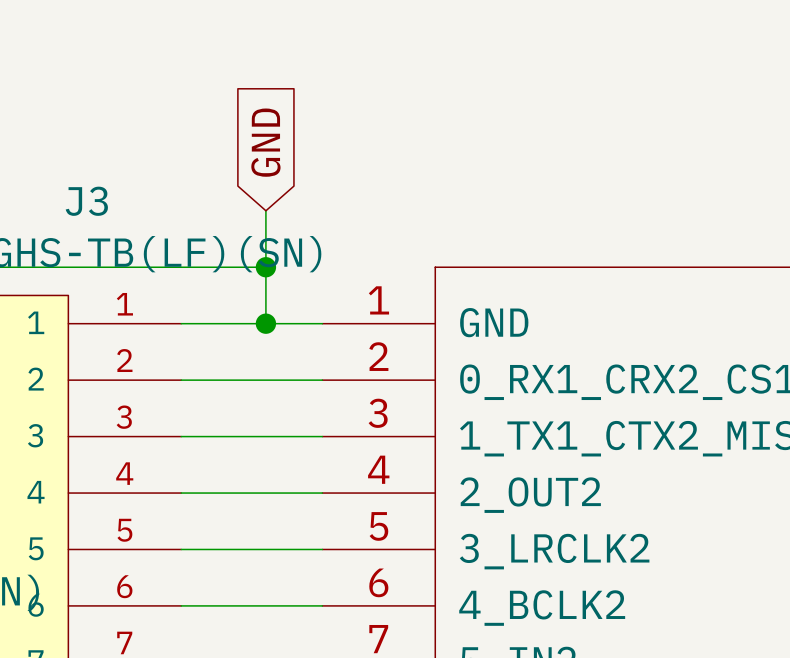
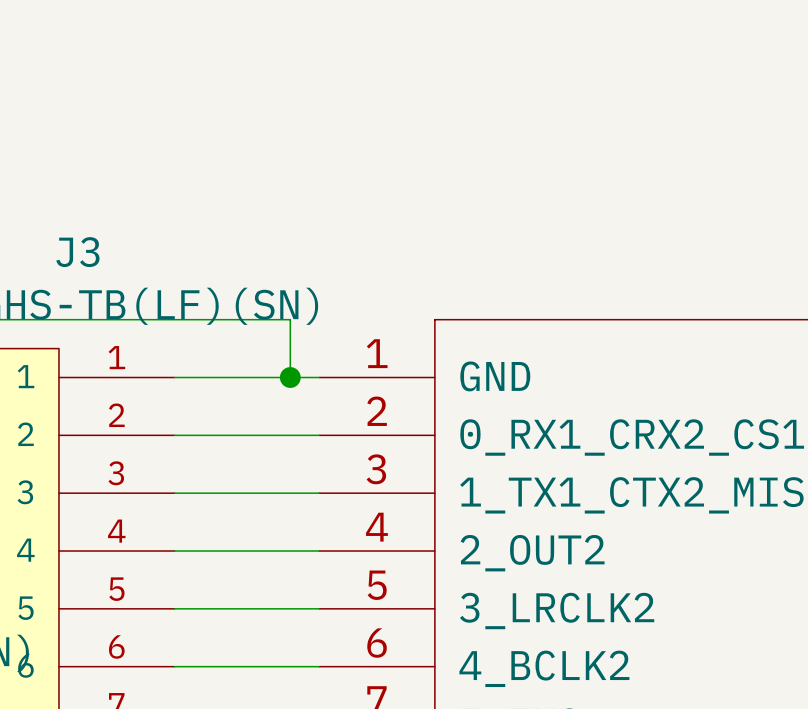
global label: GND (265, 142) -> none
wire: (265, 210) (265, 323) -> none
wire: none -> (261, 319) (290, 319) (290, 377)
junction: (265, 267) -> none
junction position: (265, 323) -> (290, 377)

